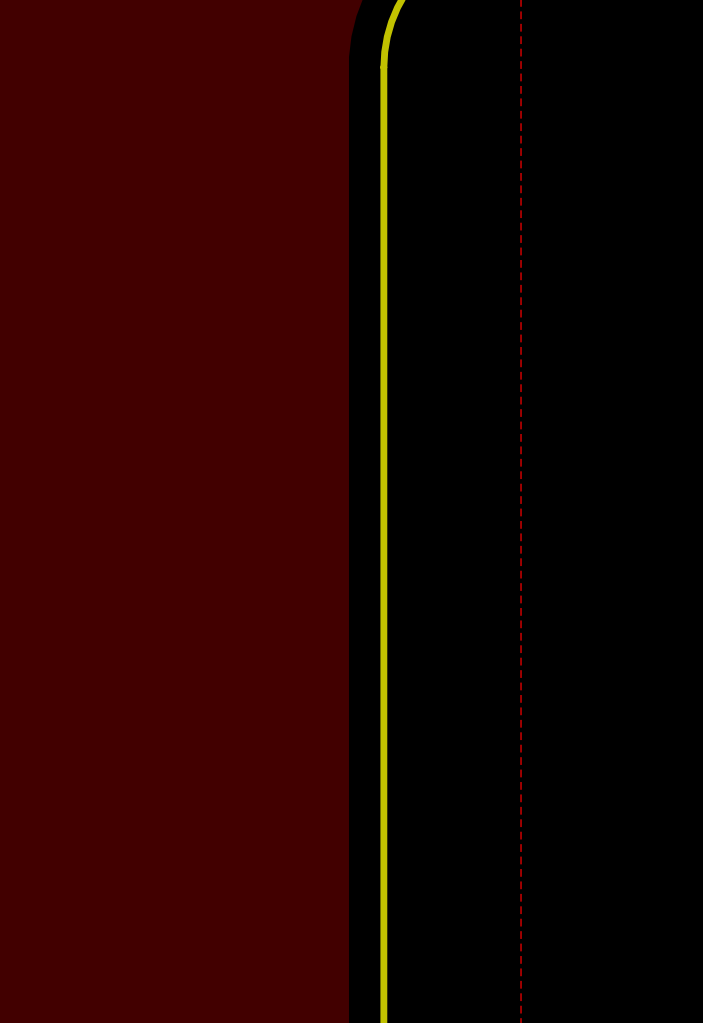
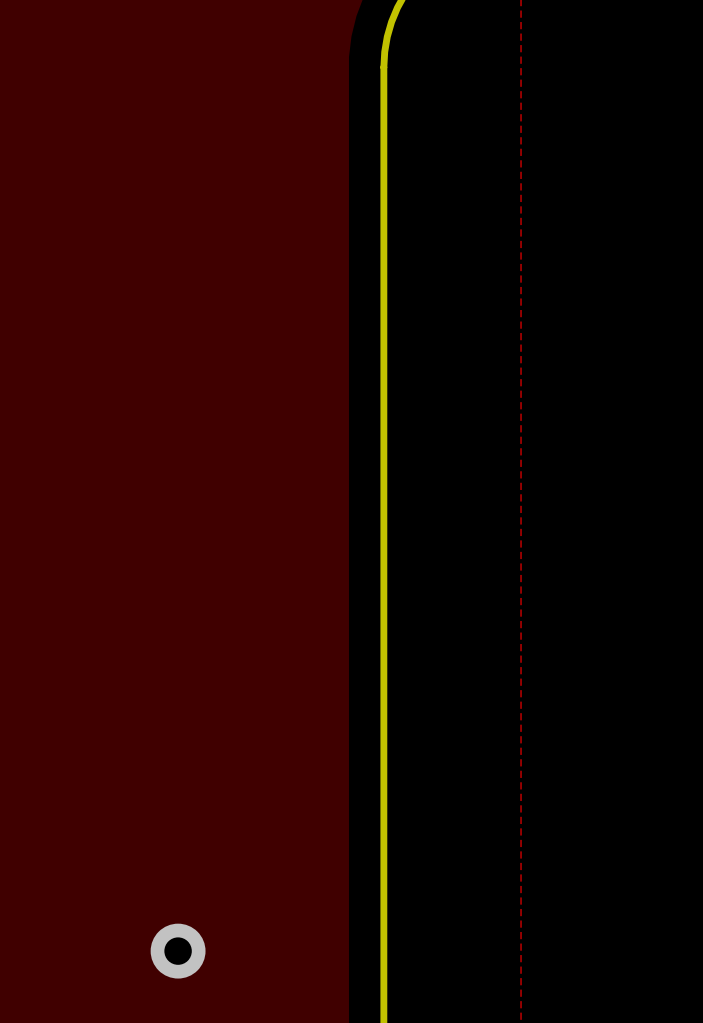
via: none -> (178, 951)

